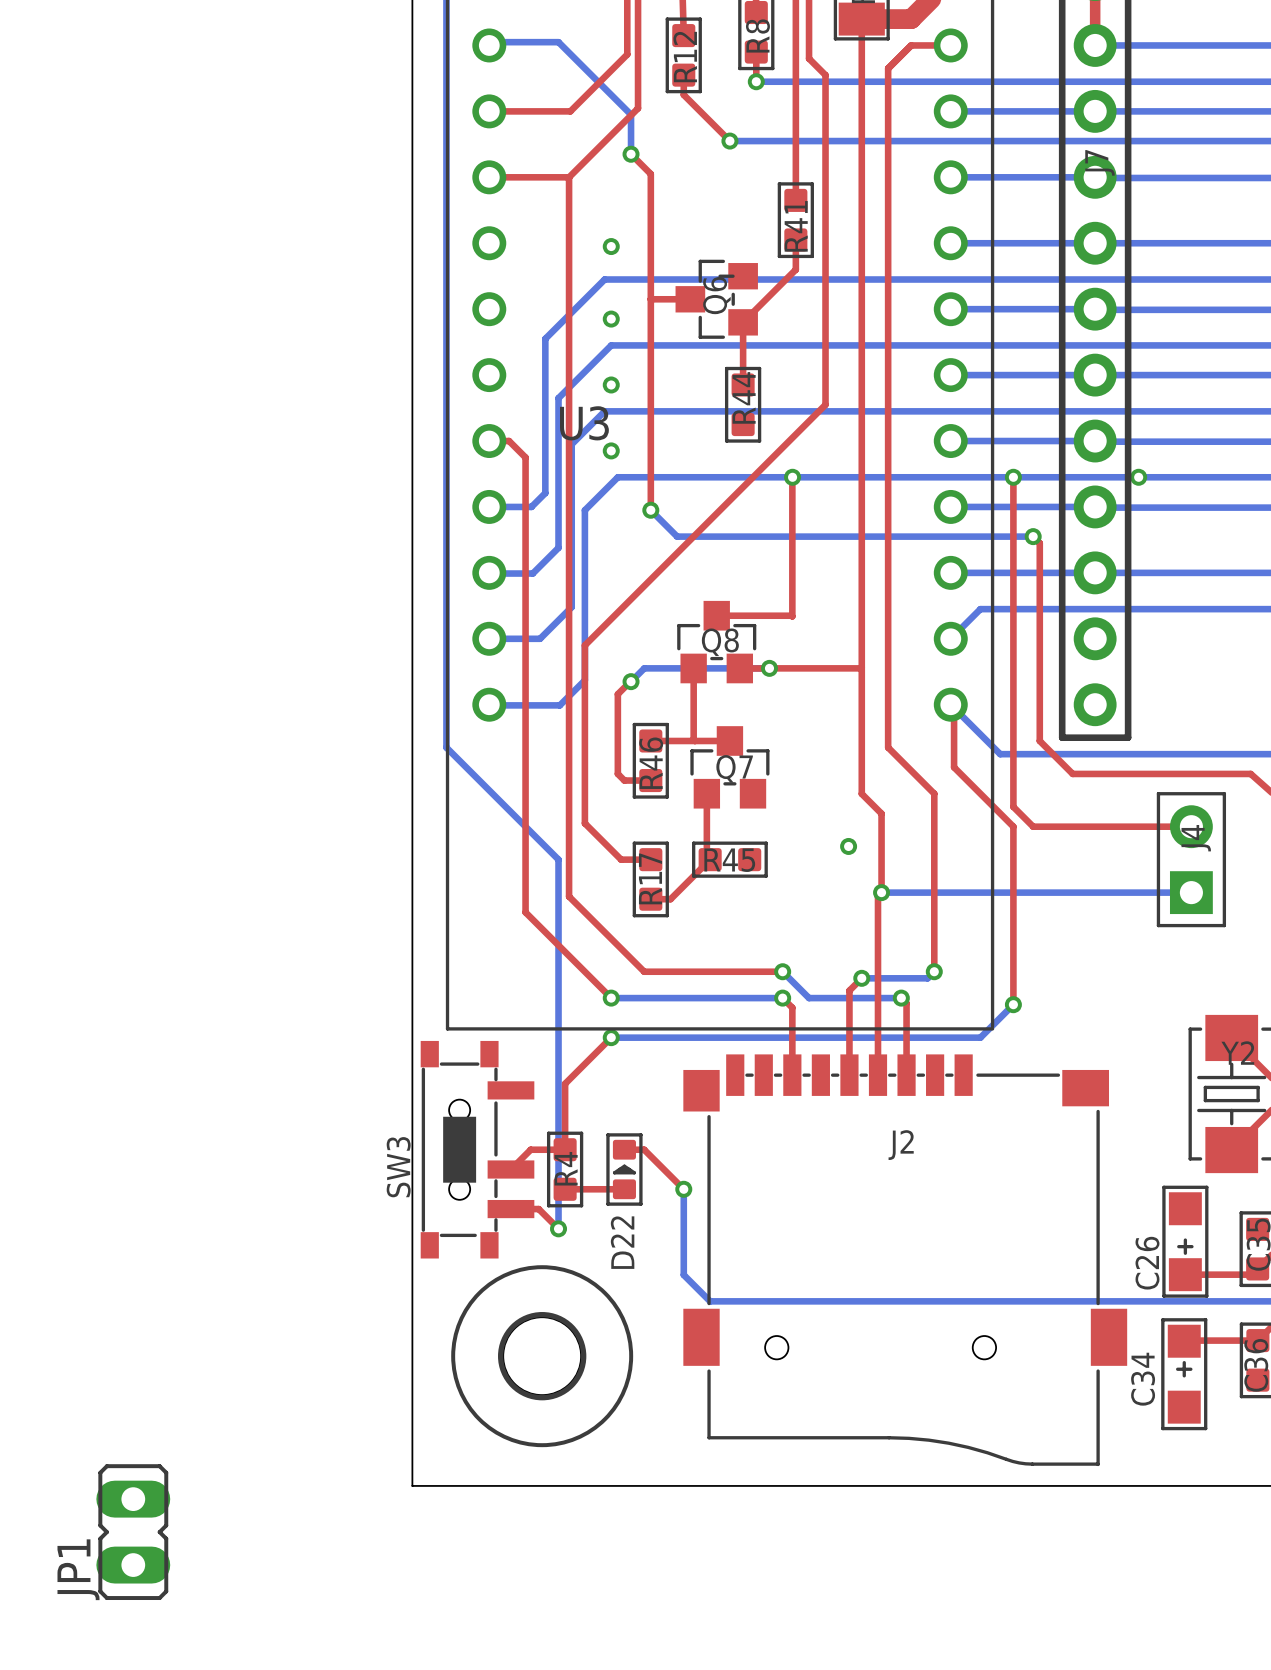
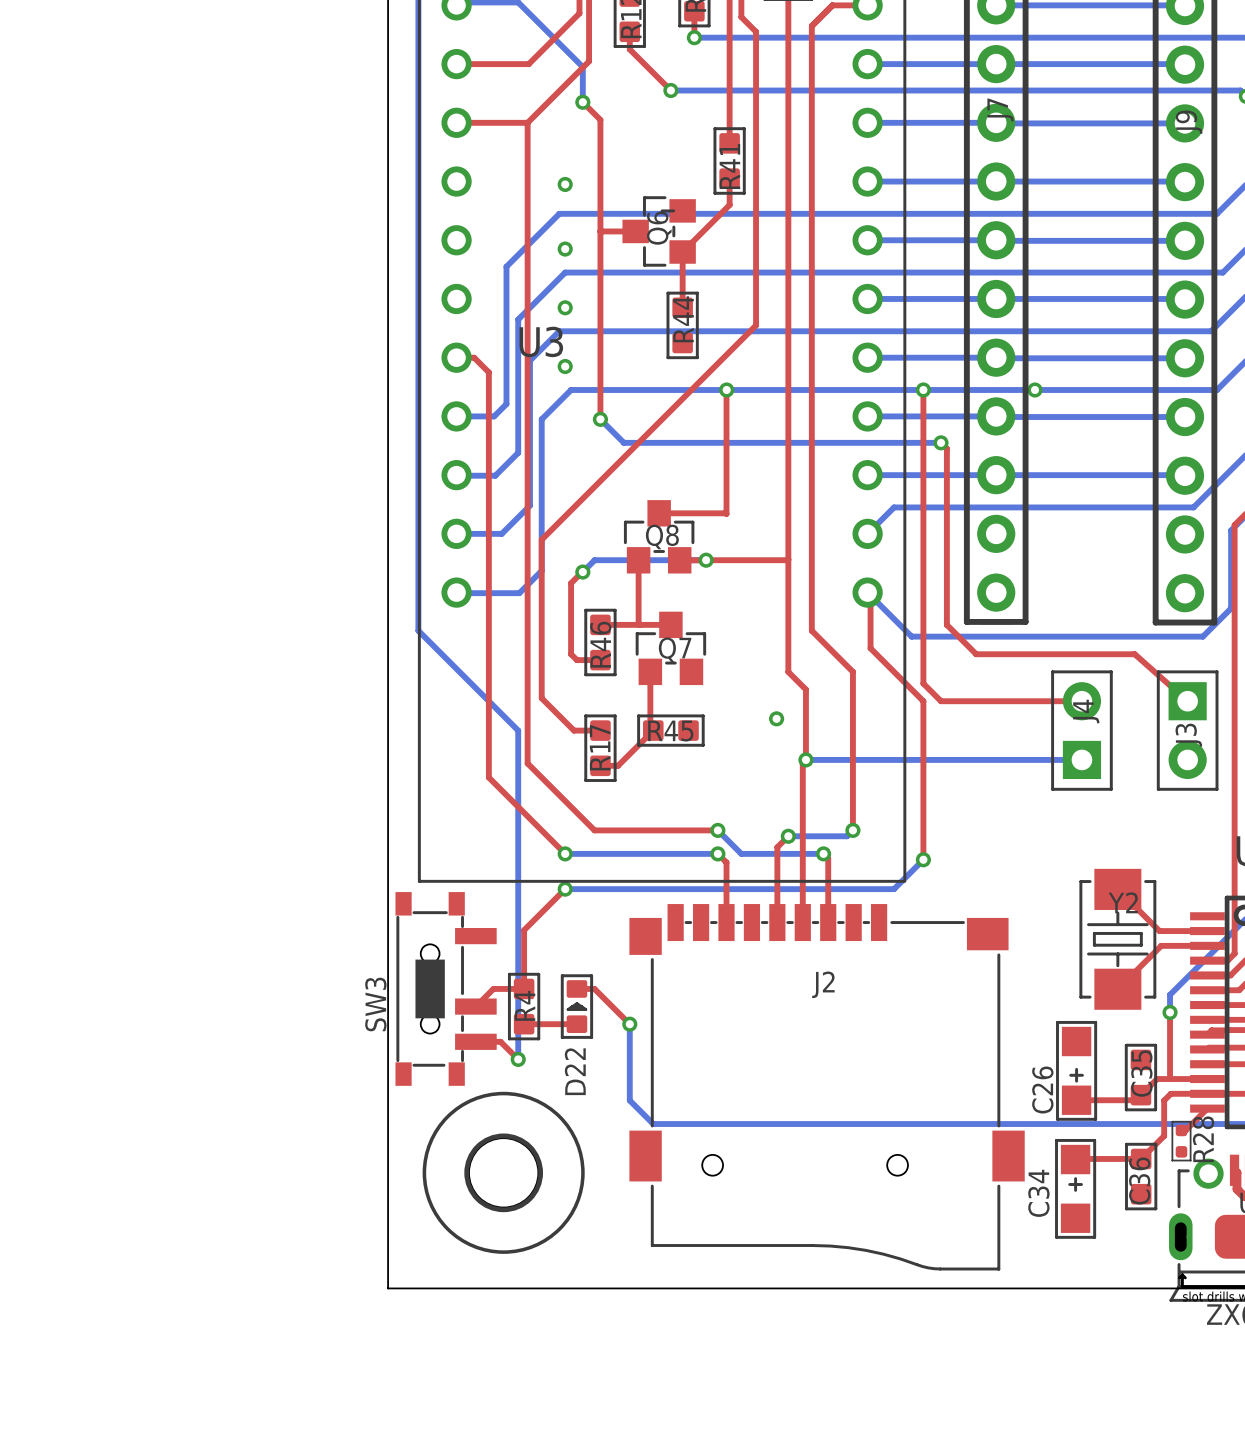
JP1: (133, 1532) -> none

